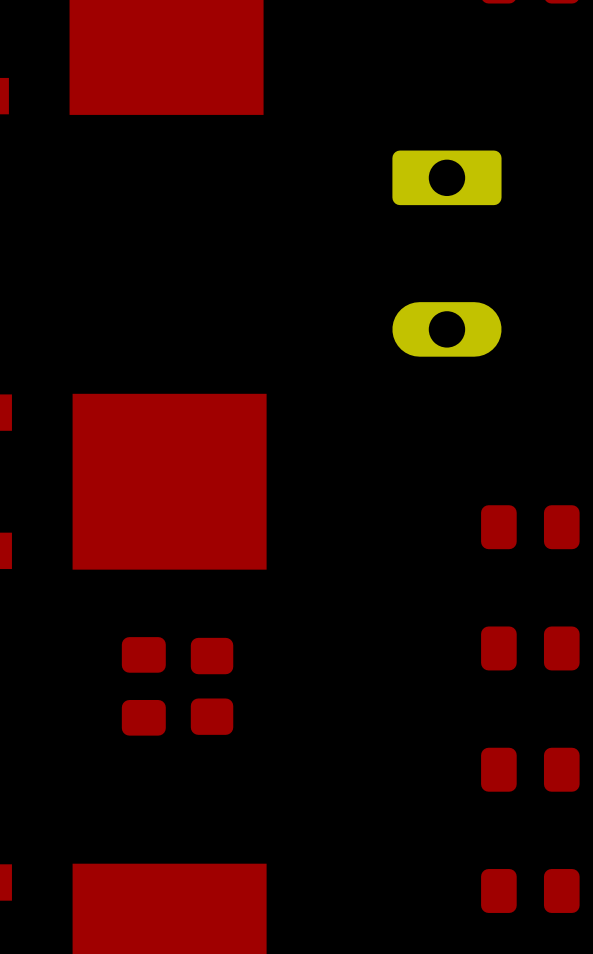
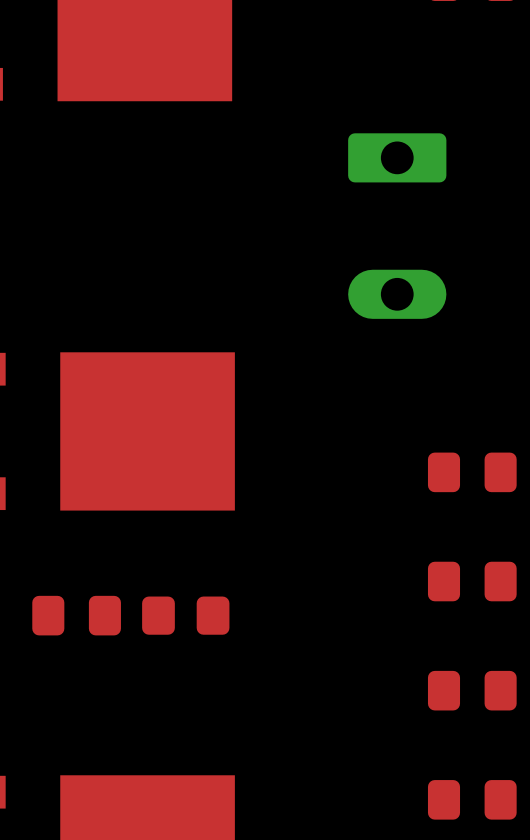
part rotation: 0° (143, 686) -> 90° clockwise (76, 615)
part rotation: 0° (212, 686) -> 90° clockwise (185, 615)

